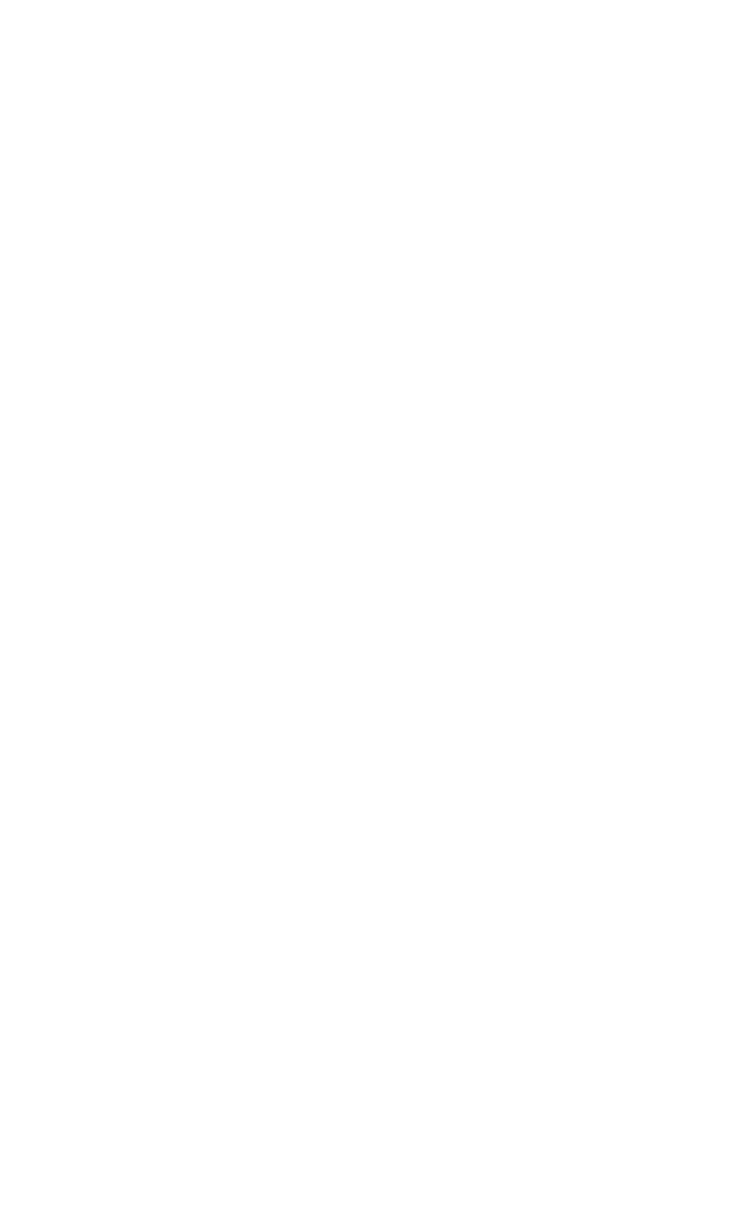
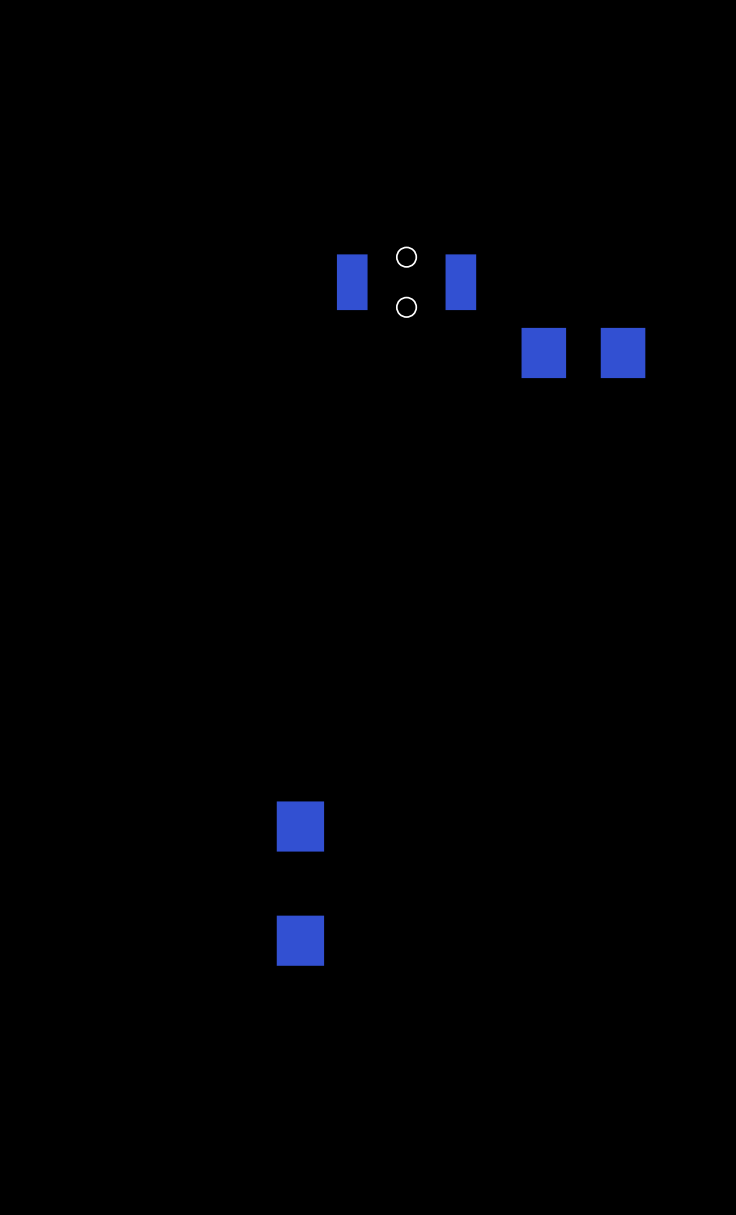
part: none -> (406, 282)
part: none -> (583, 352)
part: none -> (300, 883)

